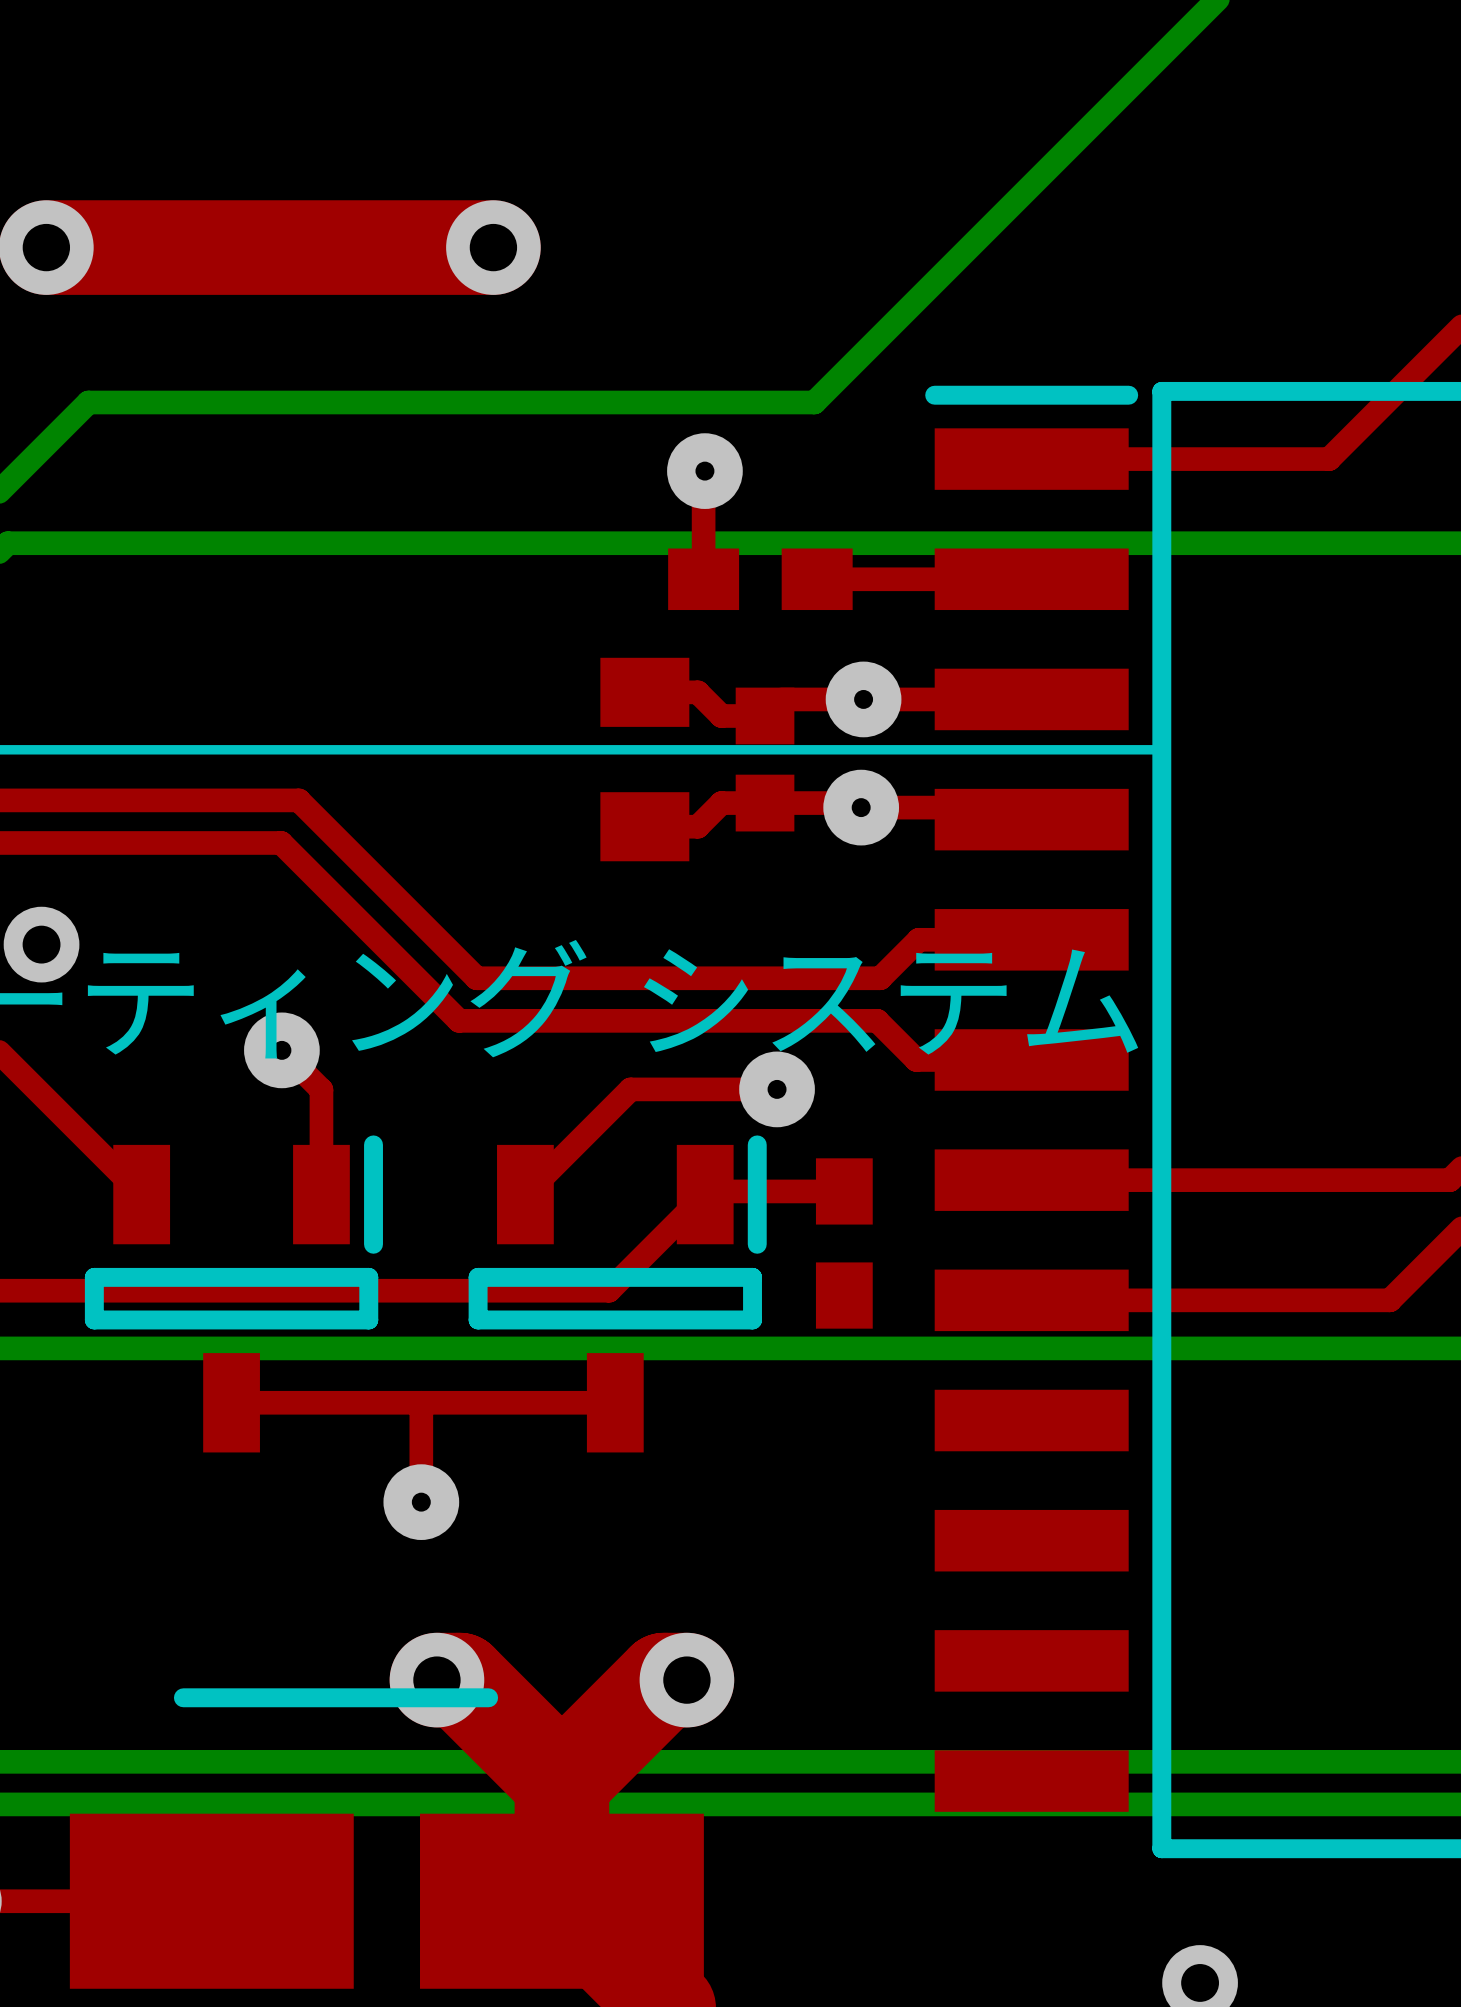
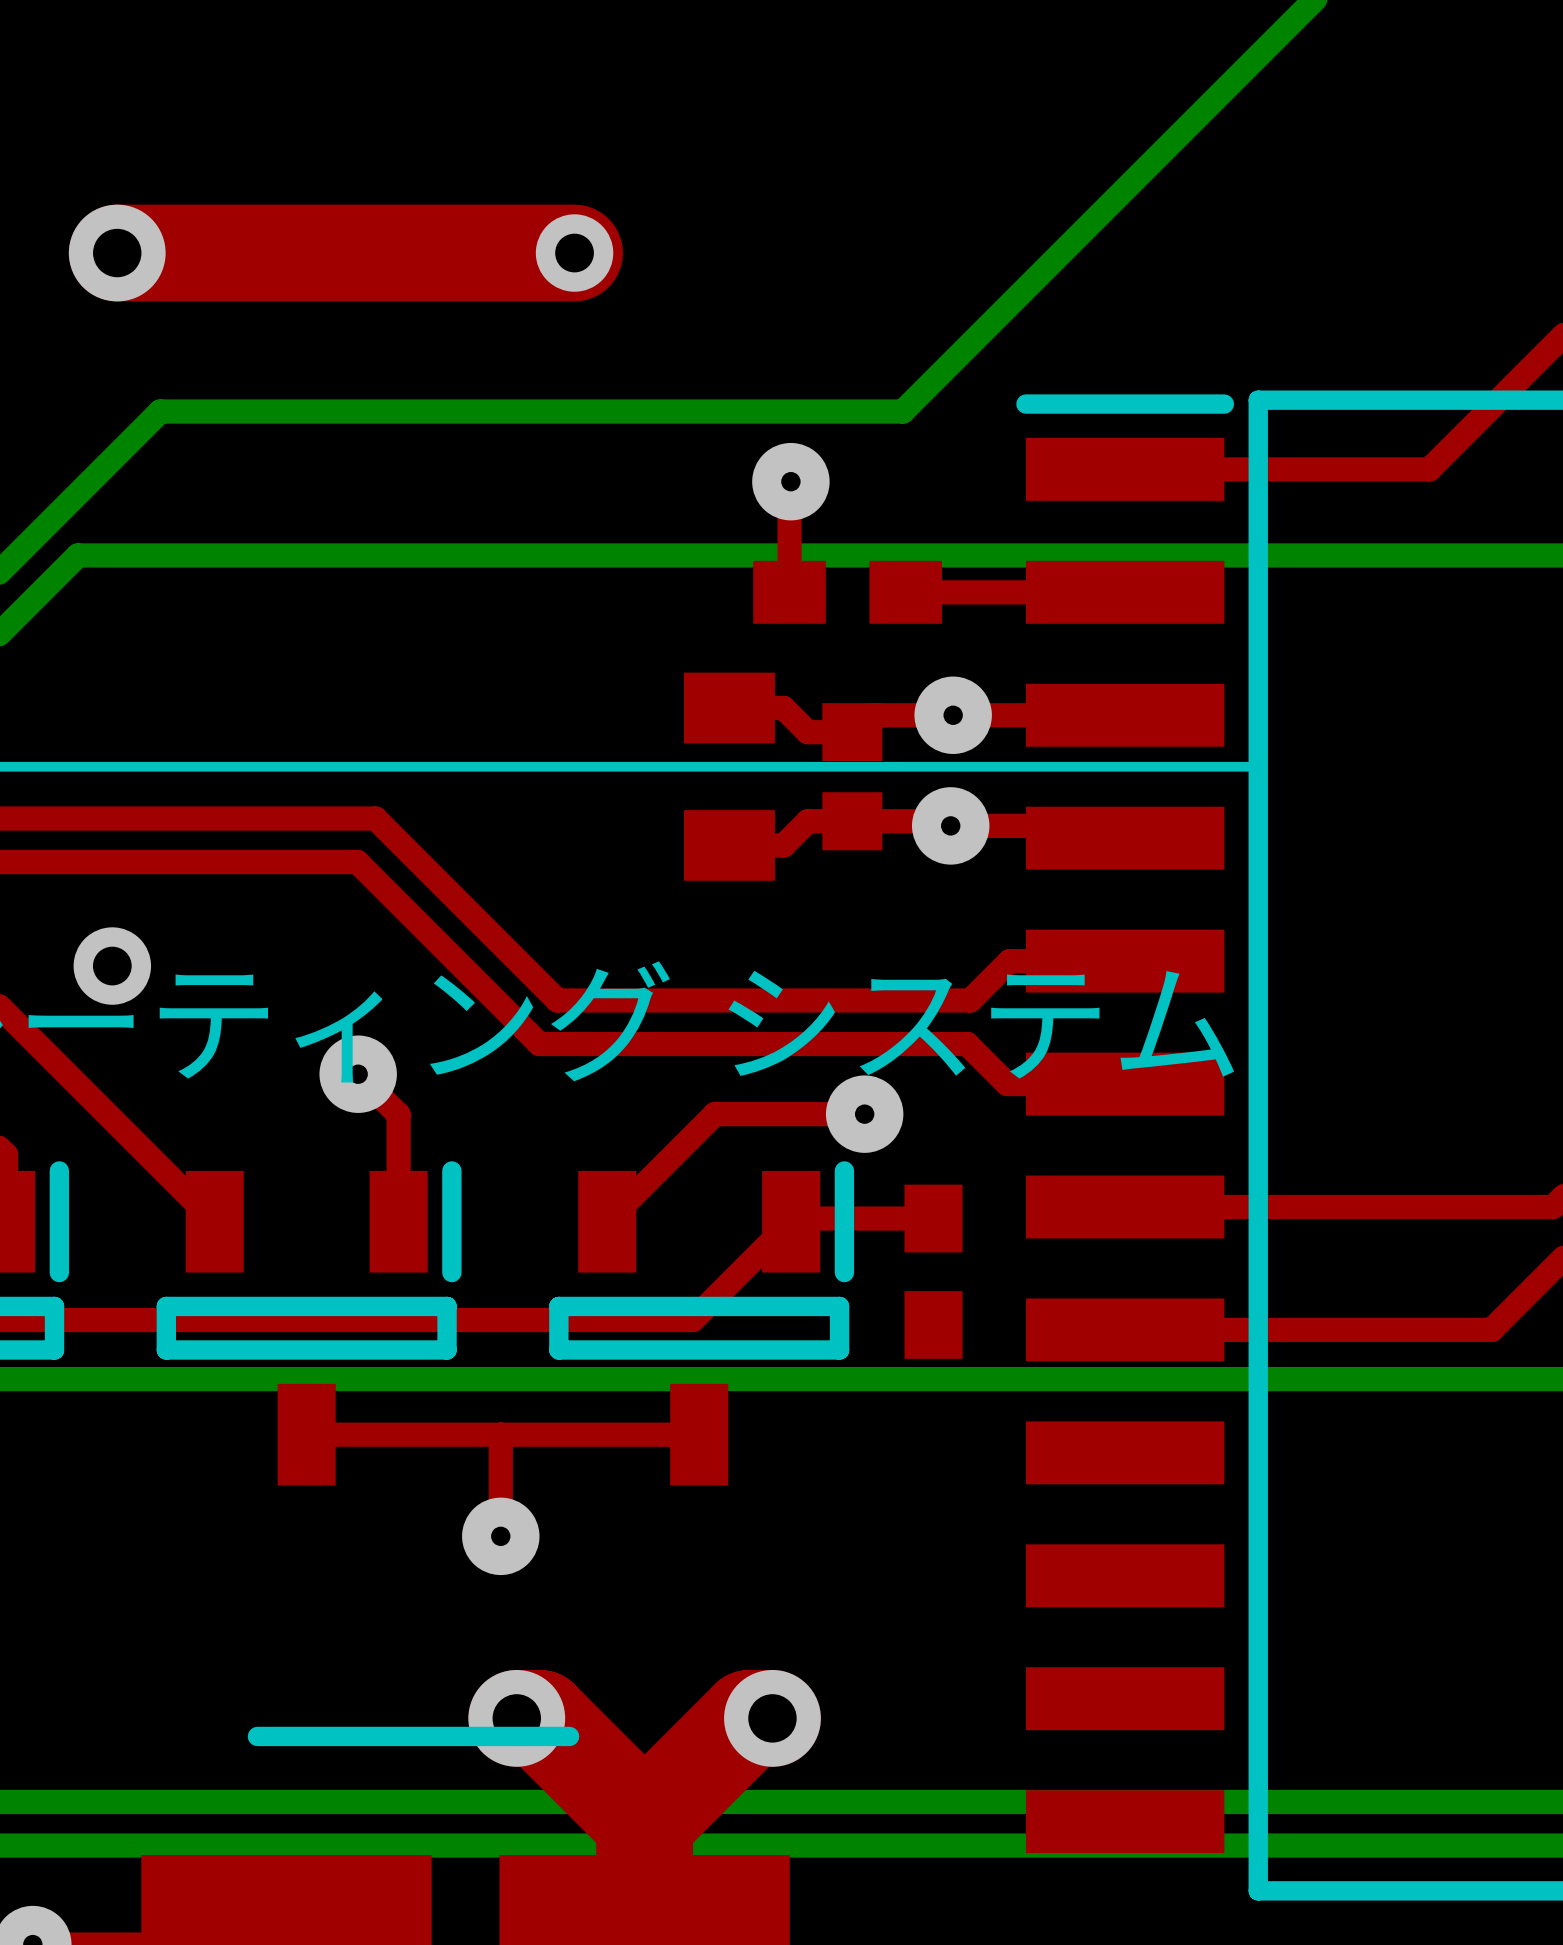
via size: [446, 200, 541, 295] -> [535, 214, 614, 292]

